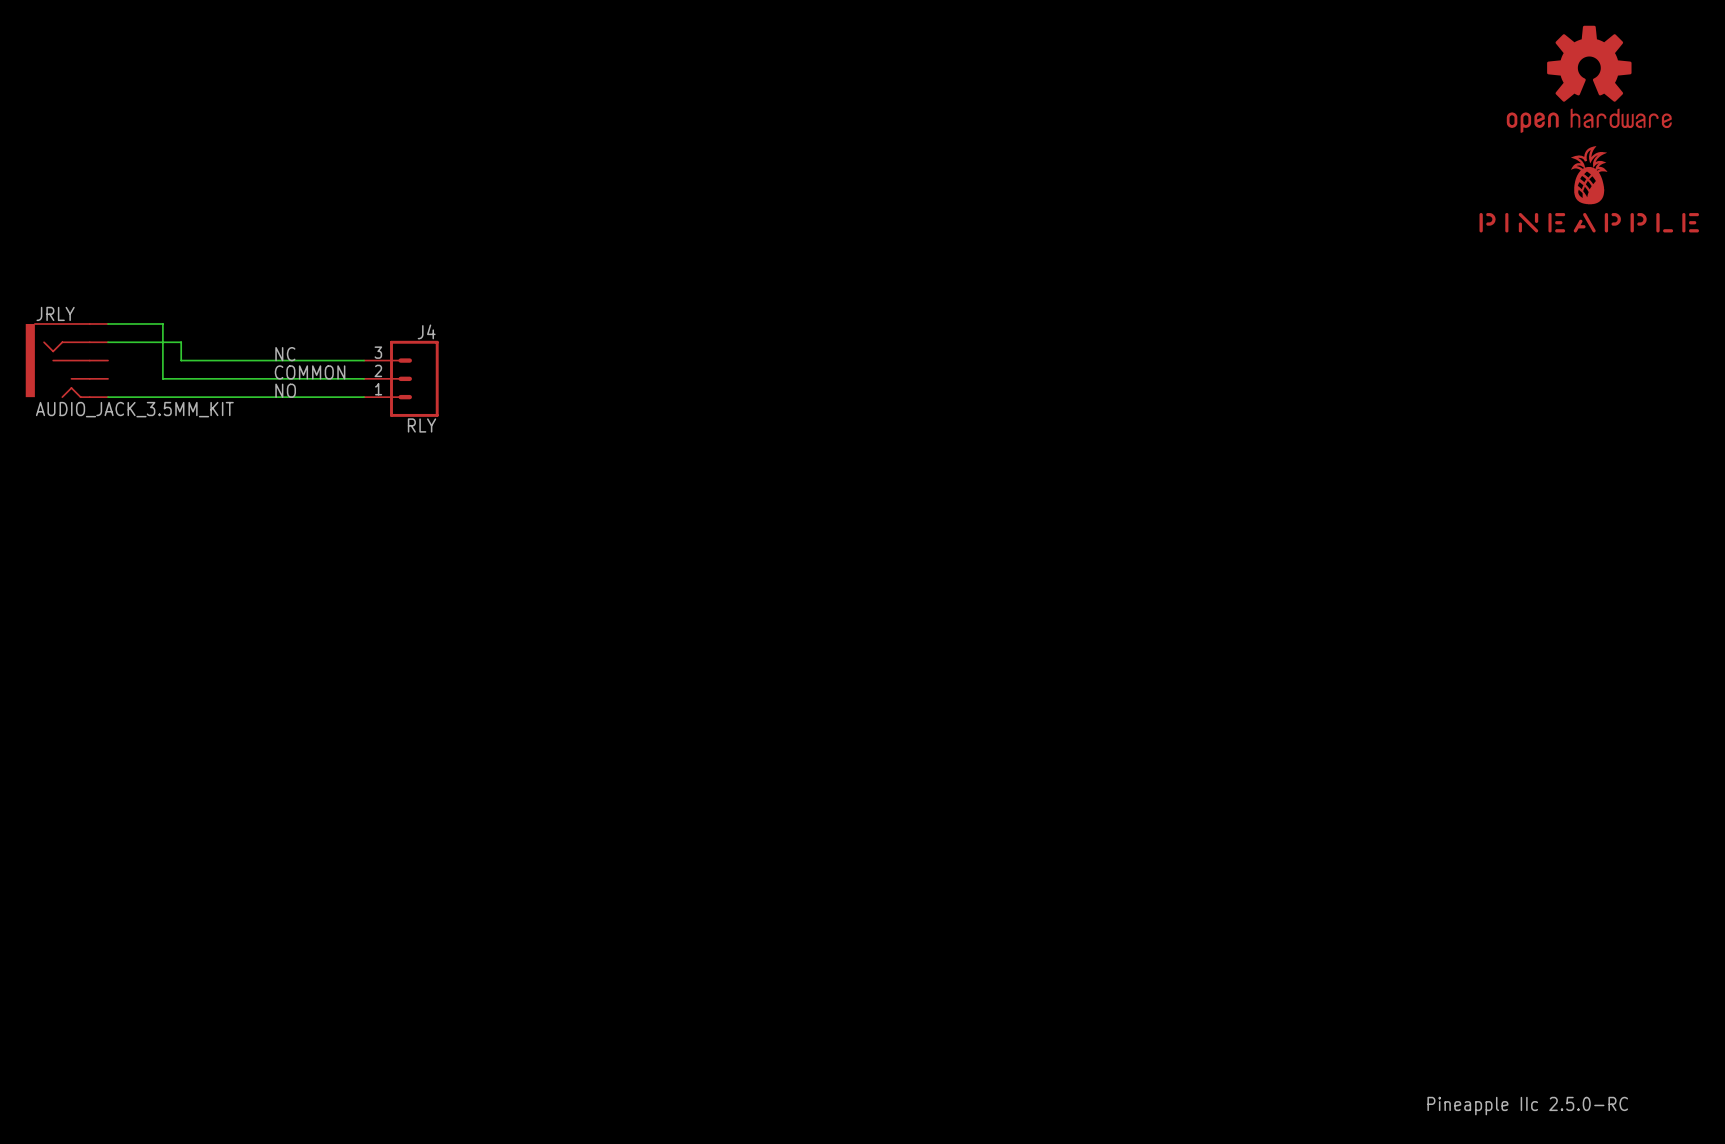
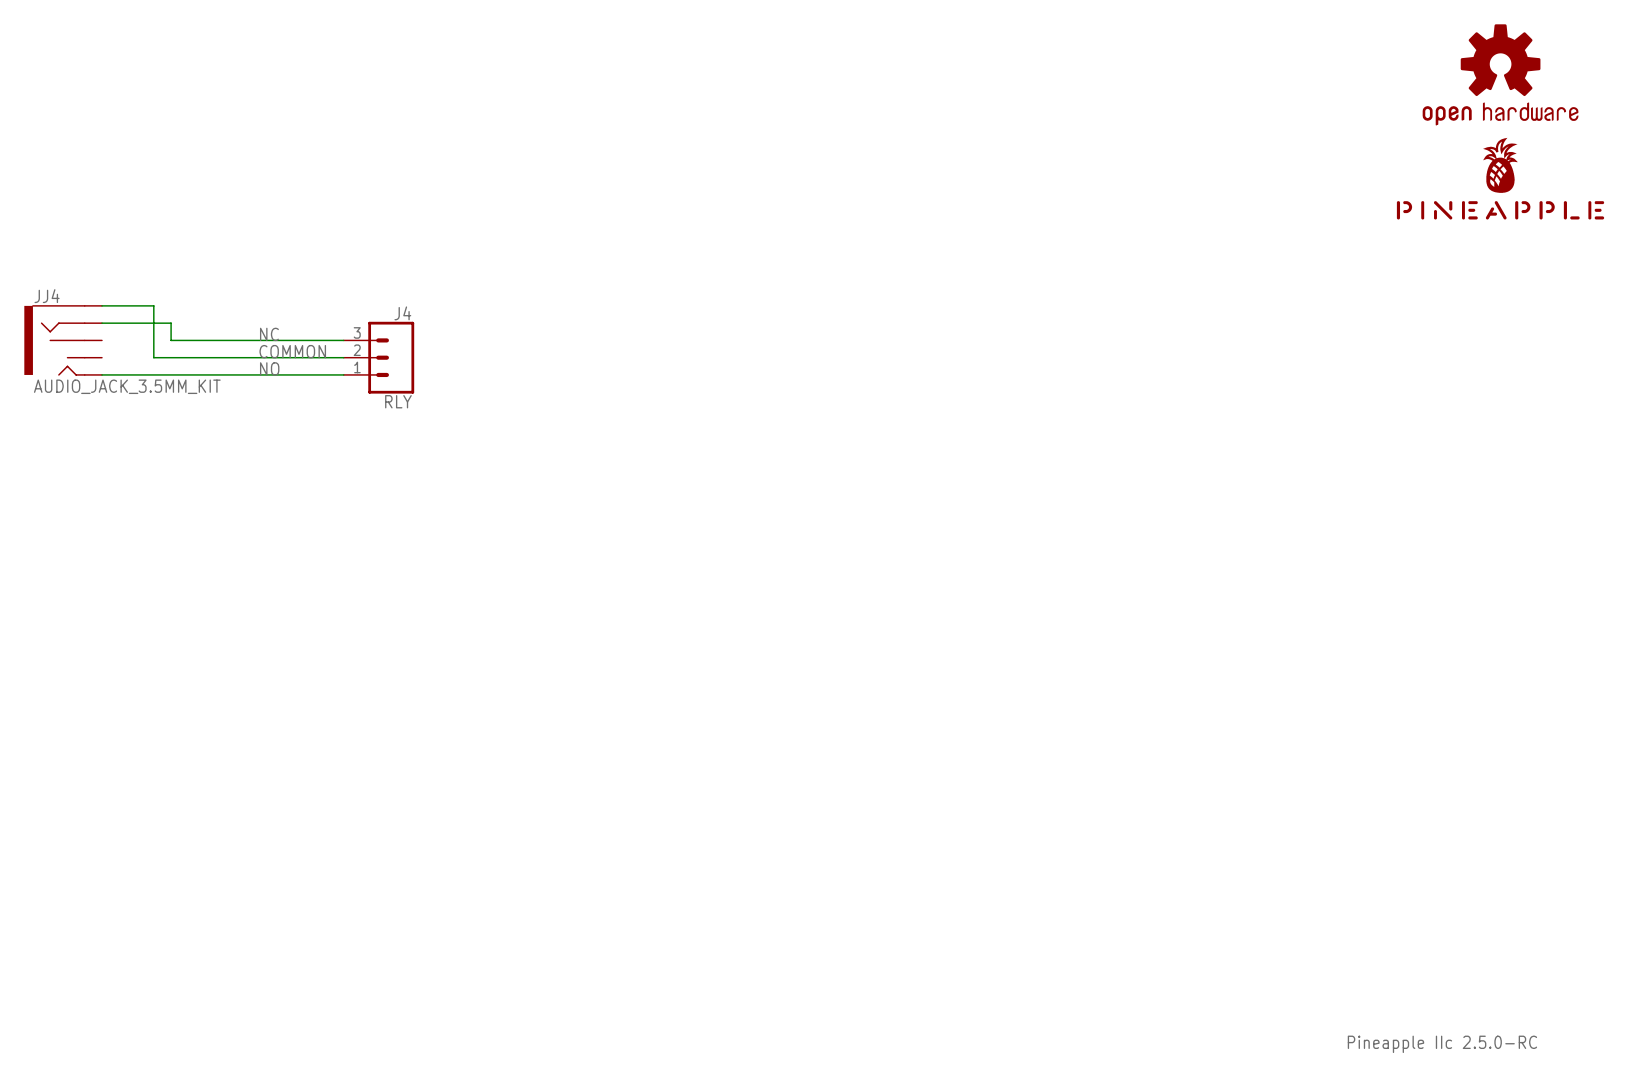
JRLY name: JRLY (55, 313) -> JJ4 (47, 296)

